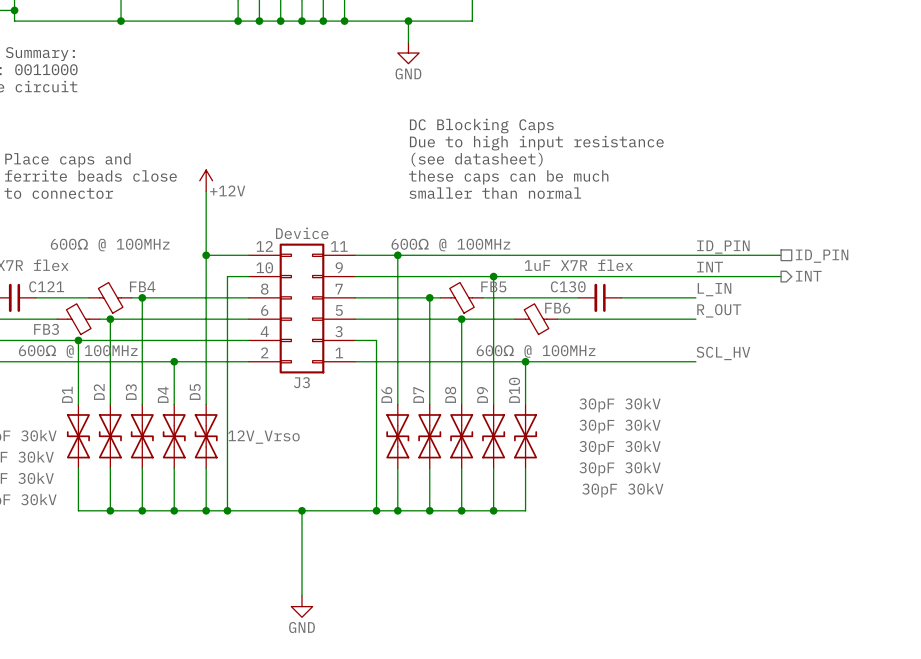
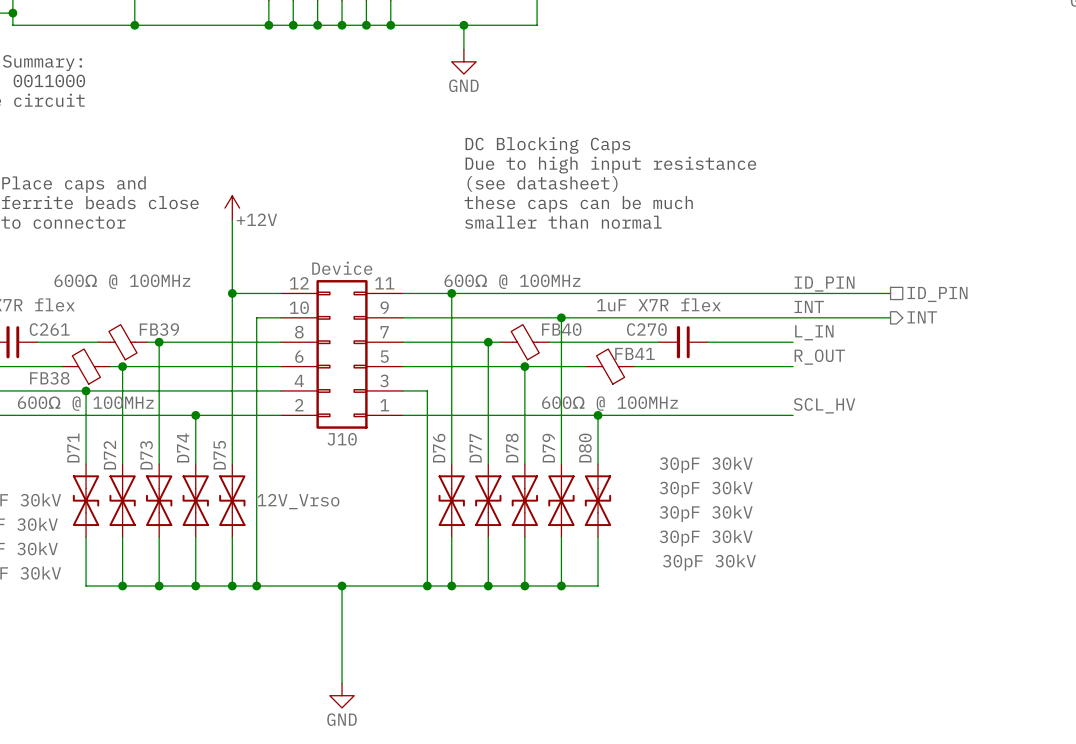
C121 name: C121 (46, 286) -> C261 (49, 329)
FB4 name: FB4 (142, 286) -> FB39 (159, 329)
FB5 name: FB5 (493, 286) -> FB40 (561, 329)
C130 name: C130 (568, 286) -> C270 (646, 329)
FB6 name: FB6 (557, 308) -> FB41 (634, 353)
FB3 name: FB3 (46, 329) -> FB38 (49, 378)
J3 name: J3 (301, 382) -> J10 (342, 439)
D10 name: D10 (514, 390) -> D80 (585, 448)
D2 name: D2 (99, 391) -> D72 (109, 455)
D5 name: D5 (195, 391) -> D75 (219, 455)
D3 name: D3 (131, 392) -> D73 (146, 455)
D1 name: D1 (67, 394) -> D71 (73, 447)
D4 name: D4 (163, 394) -> D74 (183, 447)
D6 name: D6 (386, 394) -> D76 (439, 448)
D7 name: D7 (418, 394) -> D77 (475, 448)
D8 name: D8 (450, 394) -> D78 (512, 448)
D9 name: D9 (482, 394) -> D79 (548, 448)

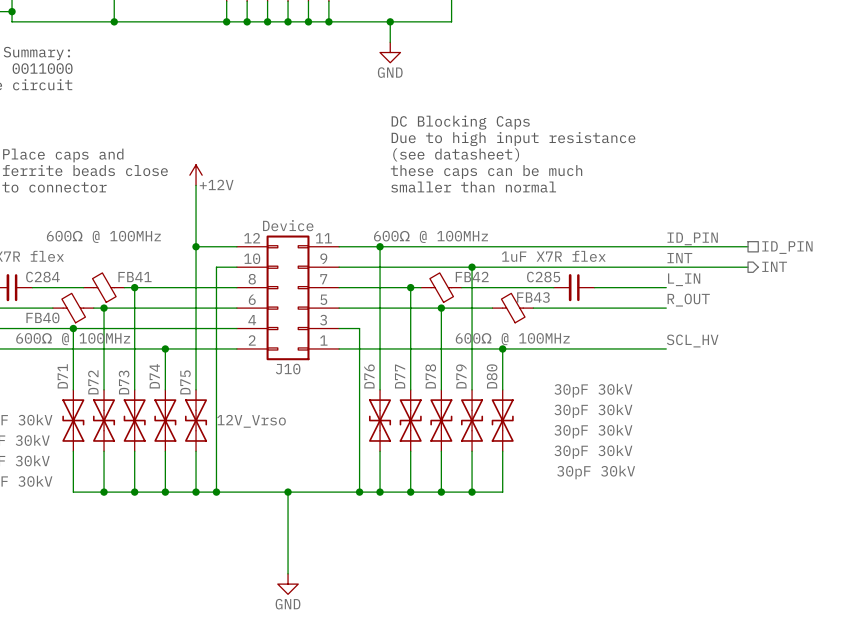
C261 name: C261 (49, 329) -> C284 (42, 277)
FB39 name: FB39 (159, 329) -> FB41 (135, 277)
FB40 name: FB40 (561, 329) -> FB42 (472, 276)
C270 name: C270 (646, 329) -> C285 (543, 277)
FB41 name: FB41 (634, 353) -> FB43 (533, 297)
FB38 name: FB38 (49, 378) -> FB40 (42, 317)

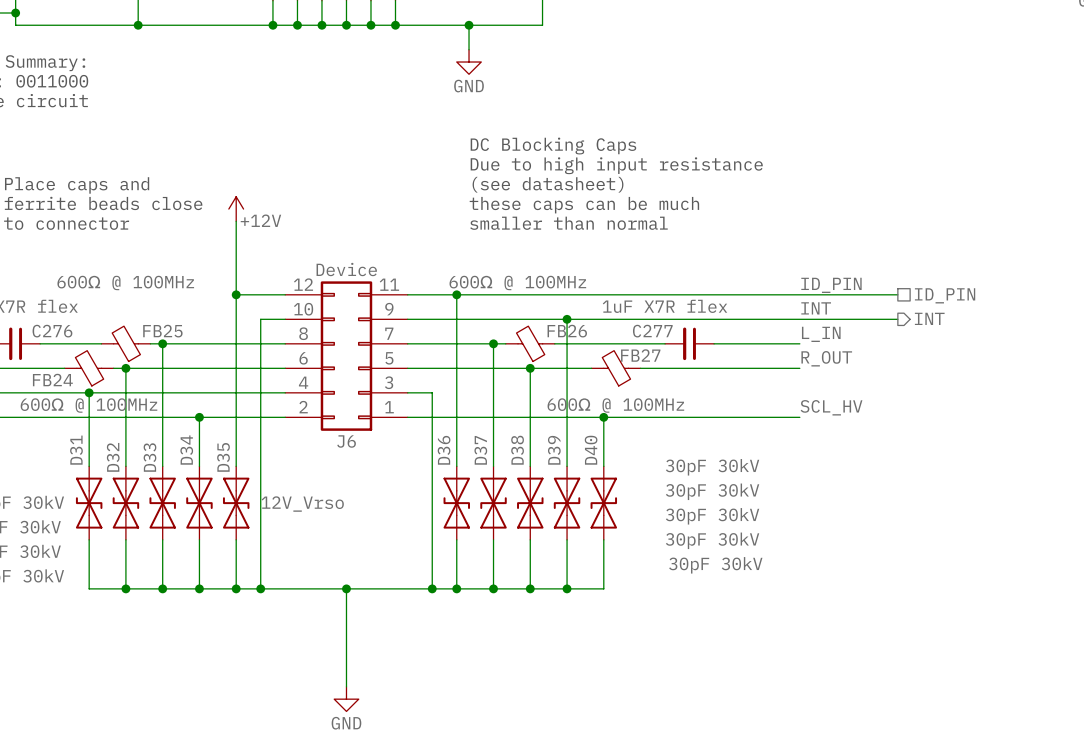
FB42 name: FB42 (472, 276) -> FB26 (567, 331)
C284 name: C284 (42, 277) -> C276 (52, 331)
FB41 name: FB41 (135, 277) -> FB25 (162, 331)
C285 name: C285 (543, 277) -> C277 (652, 331)
FB43 name: FB43 (533, 297) -> FB27 (640, 355)
FB40 name: FB40 (42, 317) -> FB24 (52, 380)
J10 name: J10 (288, 369) -> J6 (346, 441)
D71 name: D71 (62, 376) -> D31 (76, 450)
D74 name: D74 (154, 376) -> D34 (186, 450)
D76 name: D76 (369, 376) -> D36 (444, 450)
D77 name: D77 (400, 376) -> D37 (480, 450)
D78 name: D78 (430, 376) -> D38 (517, 450)
D79 name: D79 (461, 376) -> D39 (554, 450)
D80 name: D80 (492, 376) -> D40 (591, 450)
D72 name: D72 (93, 382) -> D32 (113, 457)
D73 name: D73 (124, 382) -> D33 (149, 457)
D75 name: D75 (185, 382) -> D35 (223, 457)

